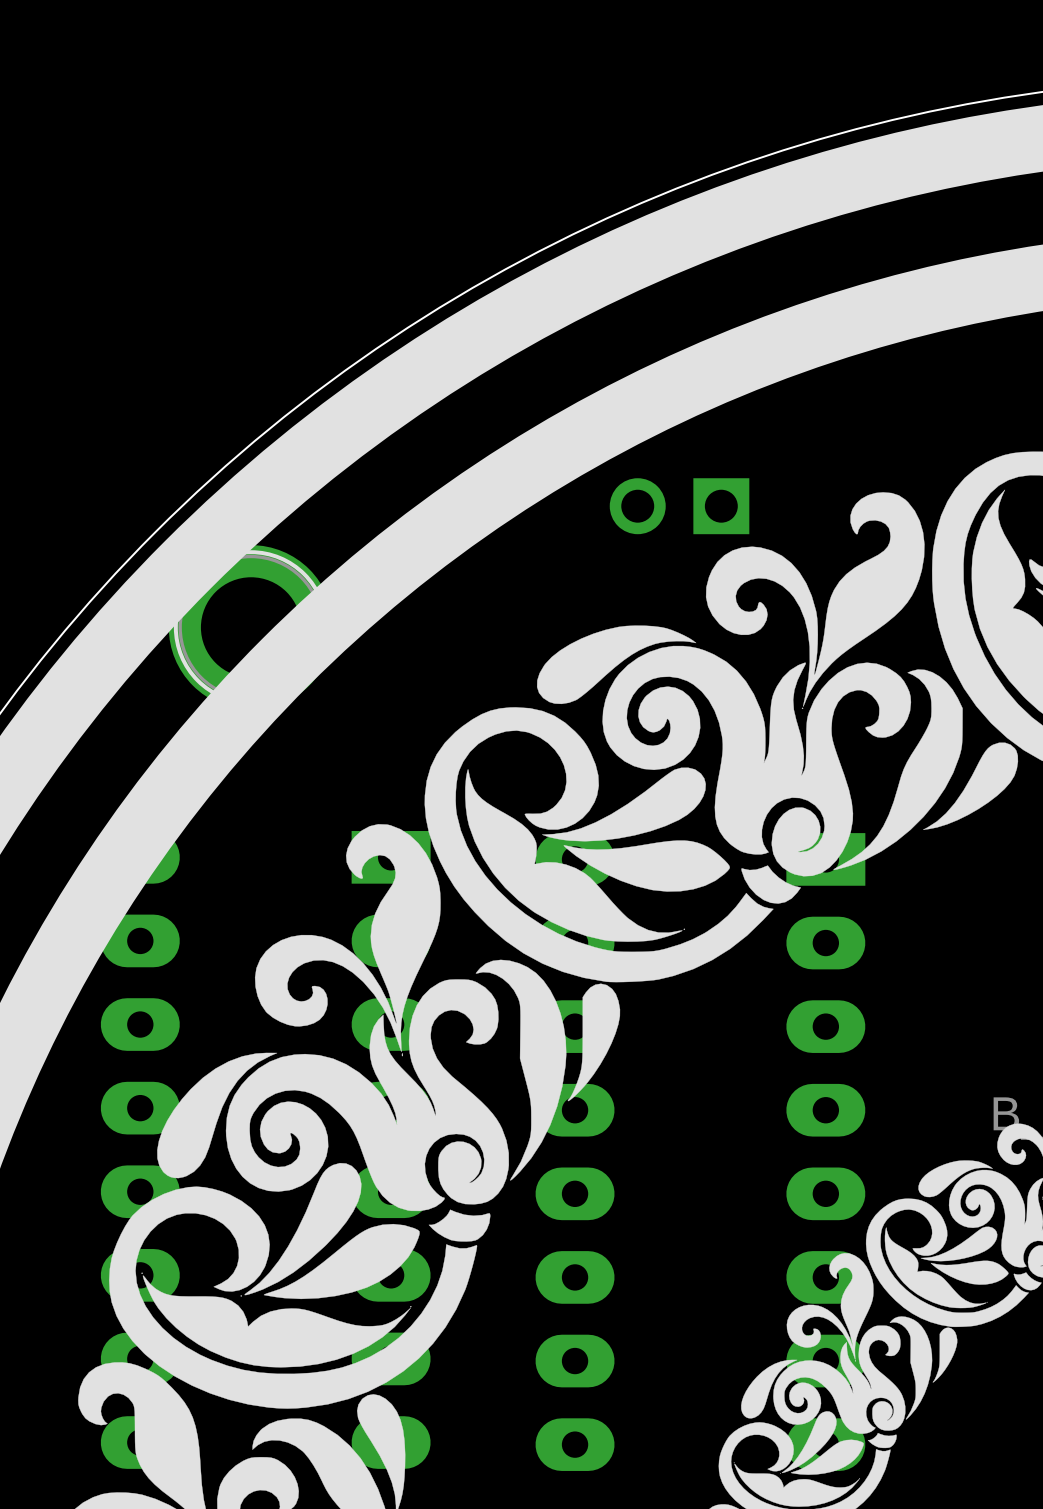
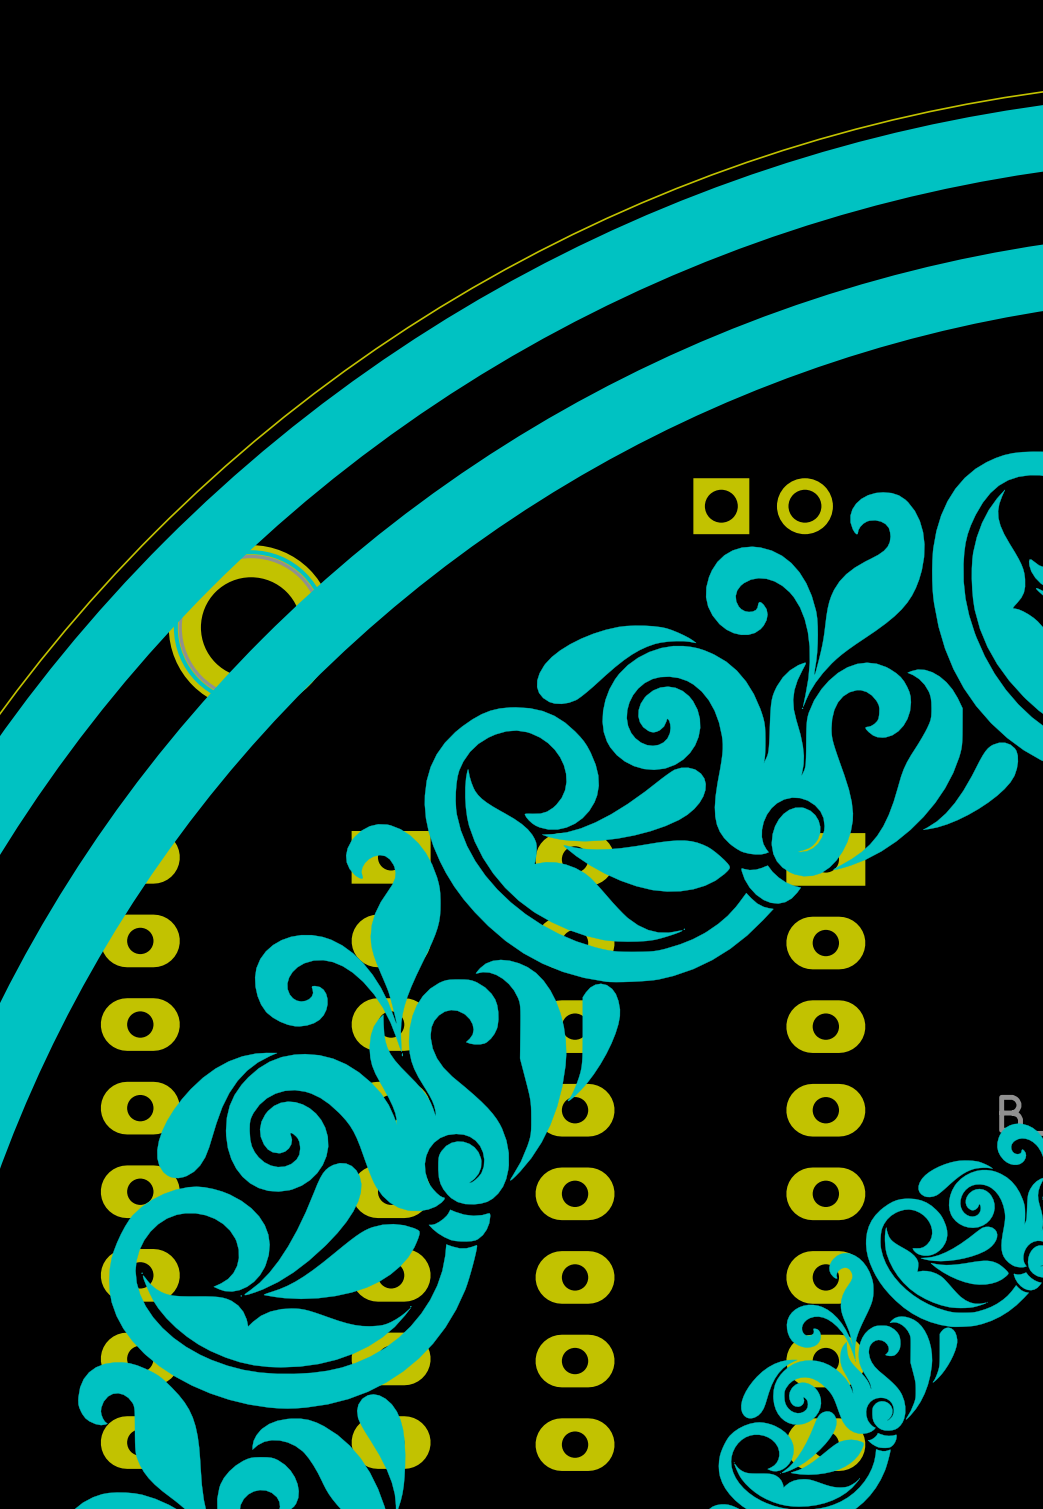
part rotation: 0° (679, 506) -> 180° (763, 506)

